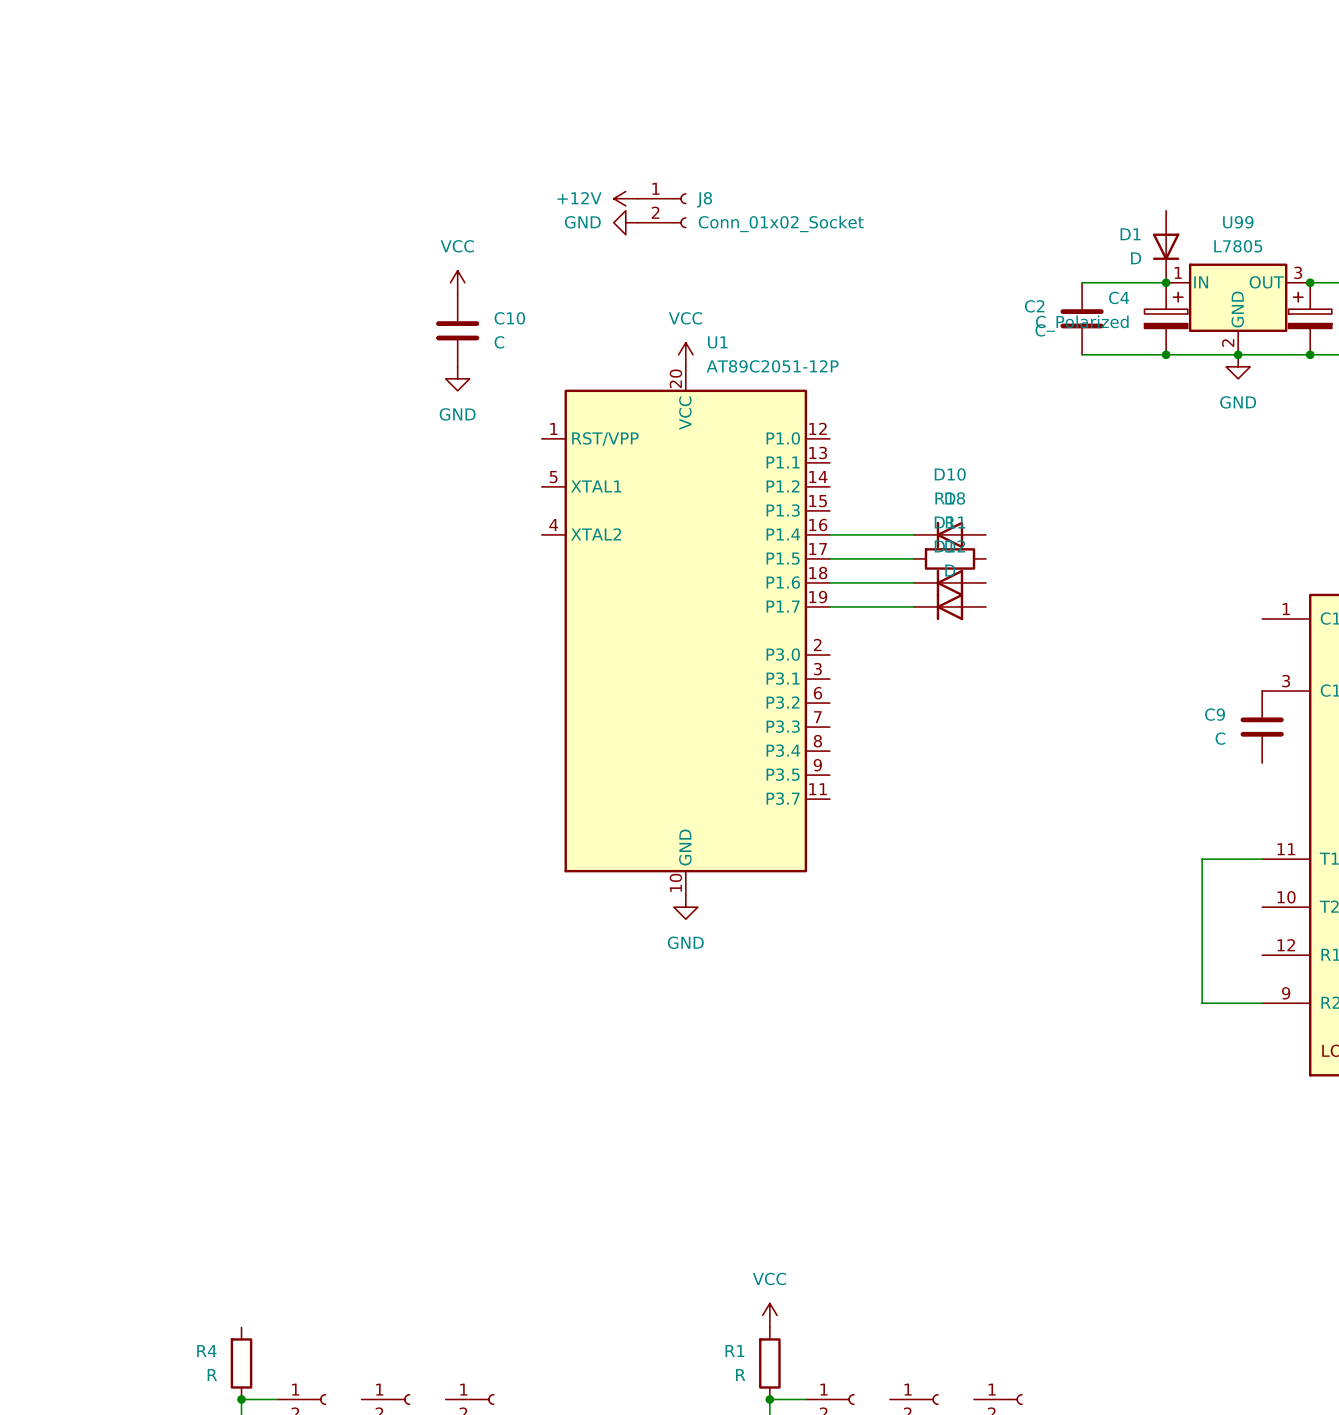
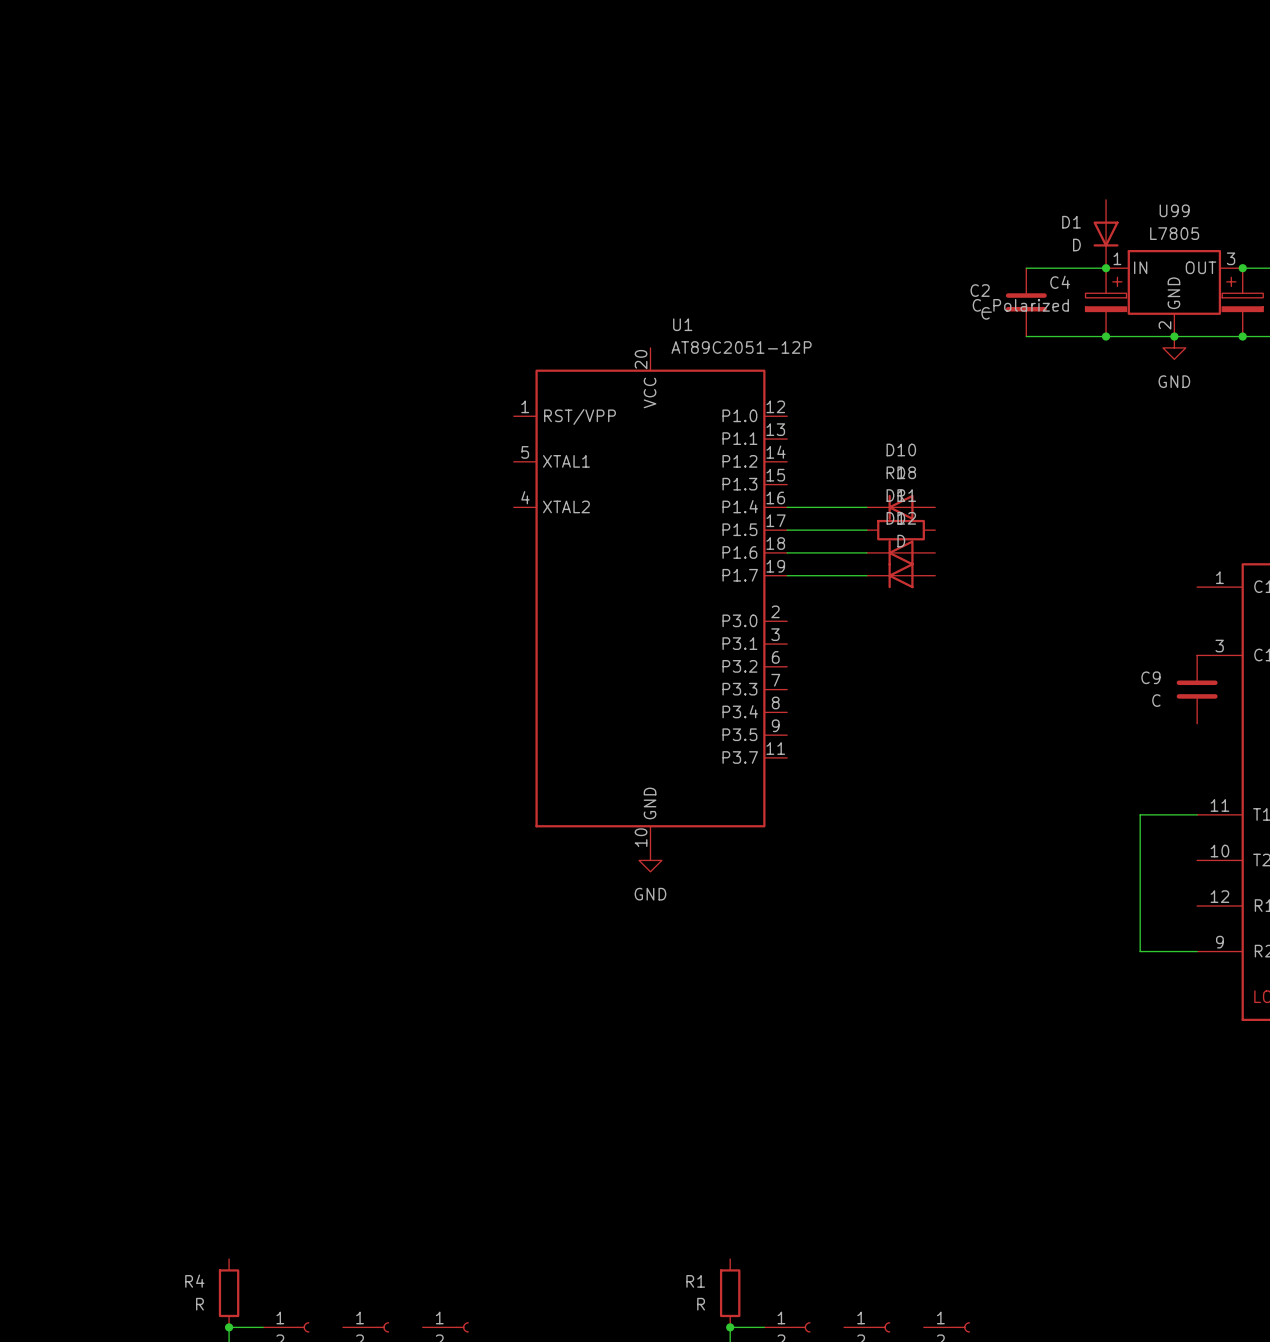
power symbol: +12V (625, 198) -> none
J8: Conn_01x02_Socket (662, 210) -> none
power symbol: GND (625, 222) -> none
power symbol: VCC (457, 282) -> none
C10: C (457, 330) -> none
power symbol: VCC (685, 354) -> none
power symbol: GND (457, 378) -> none
power symbol: VCC (769, 1315) -> none

